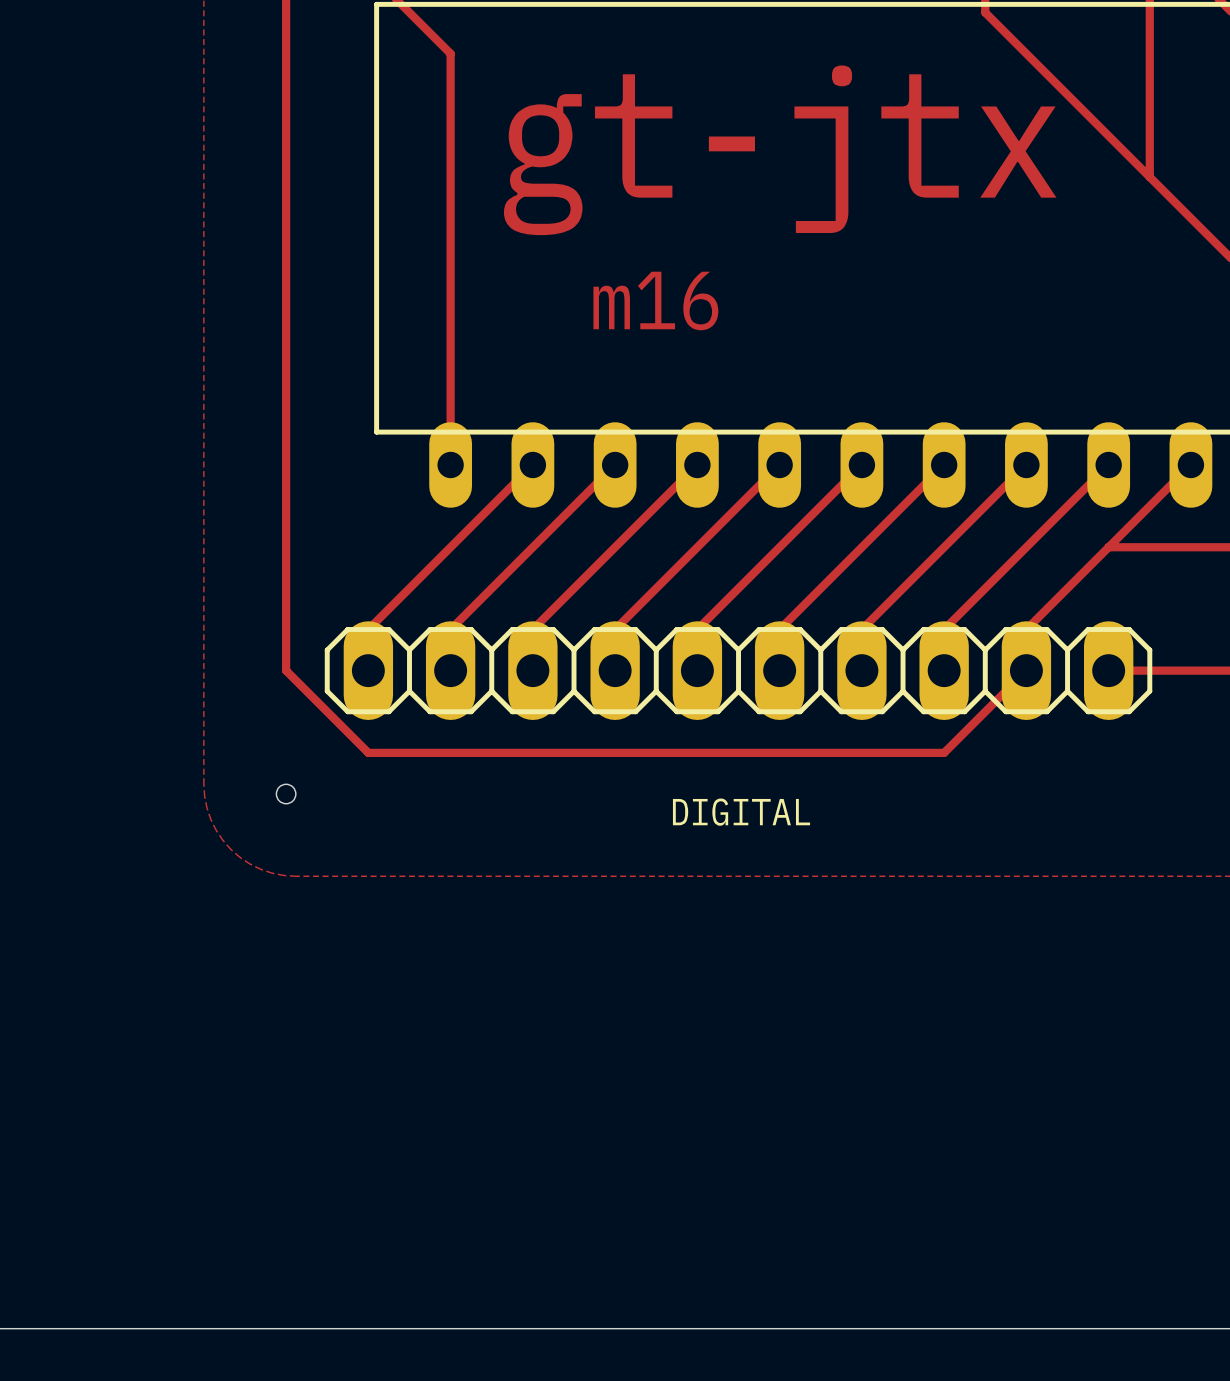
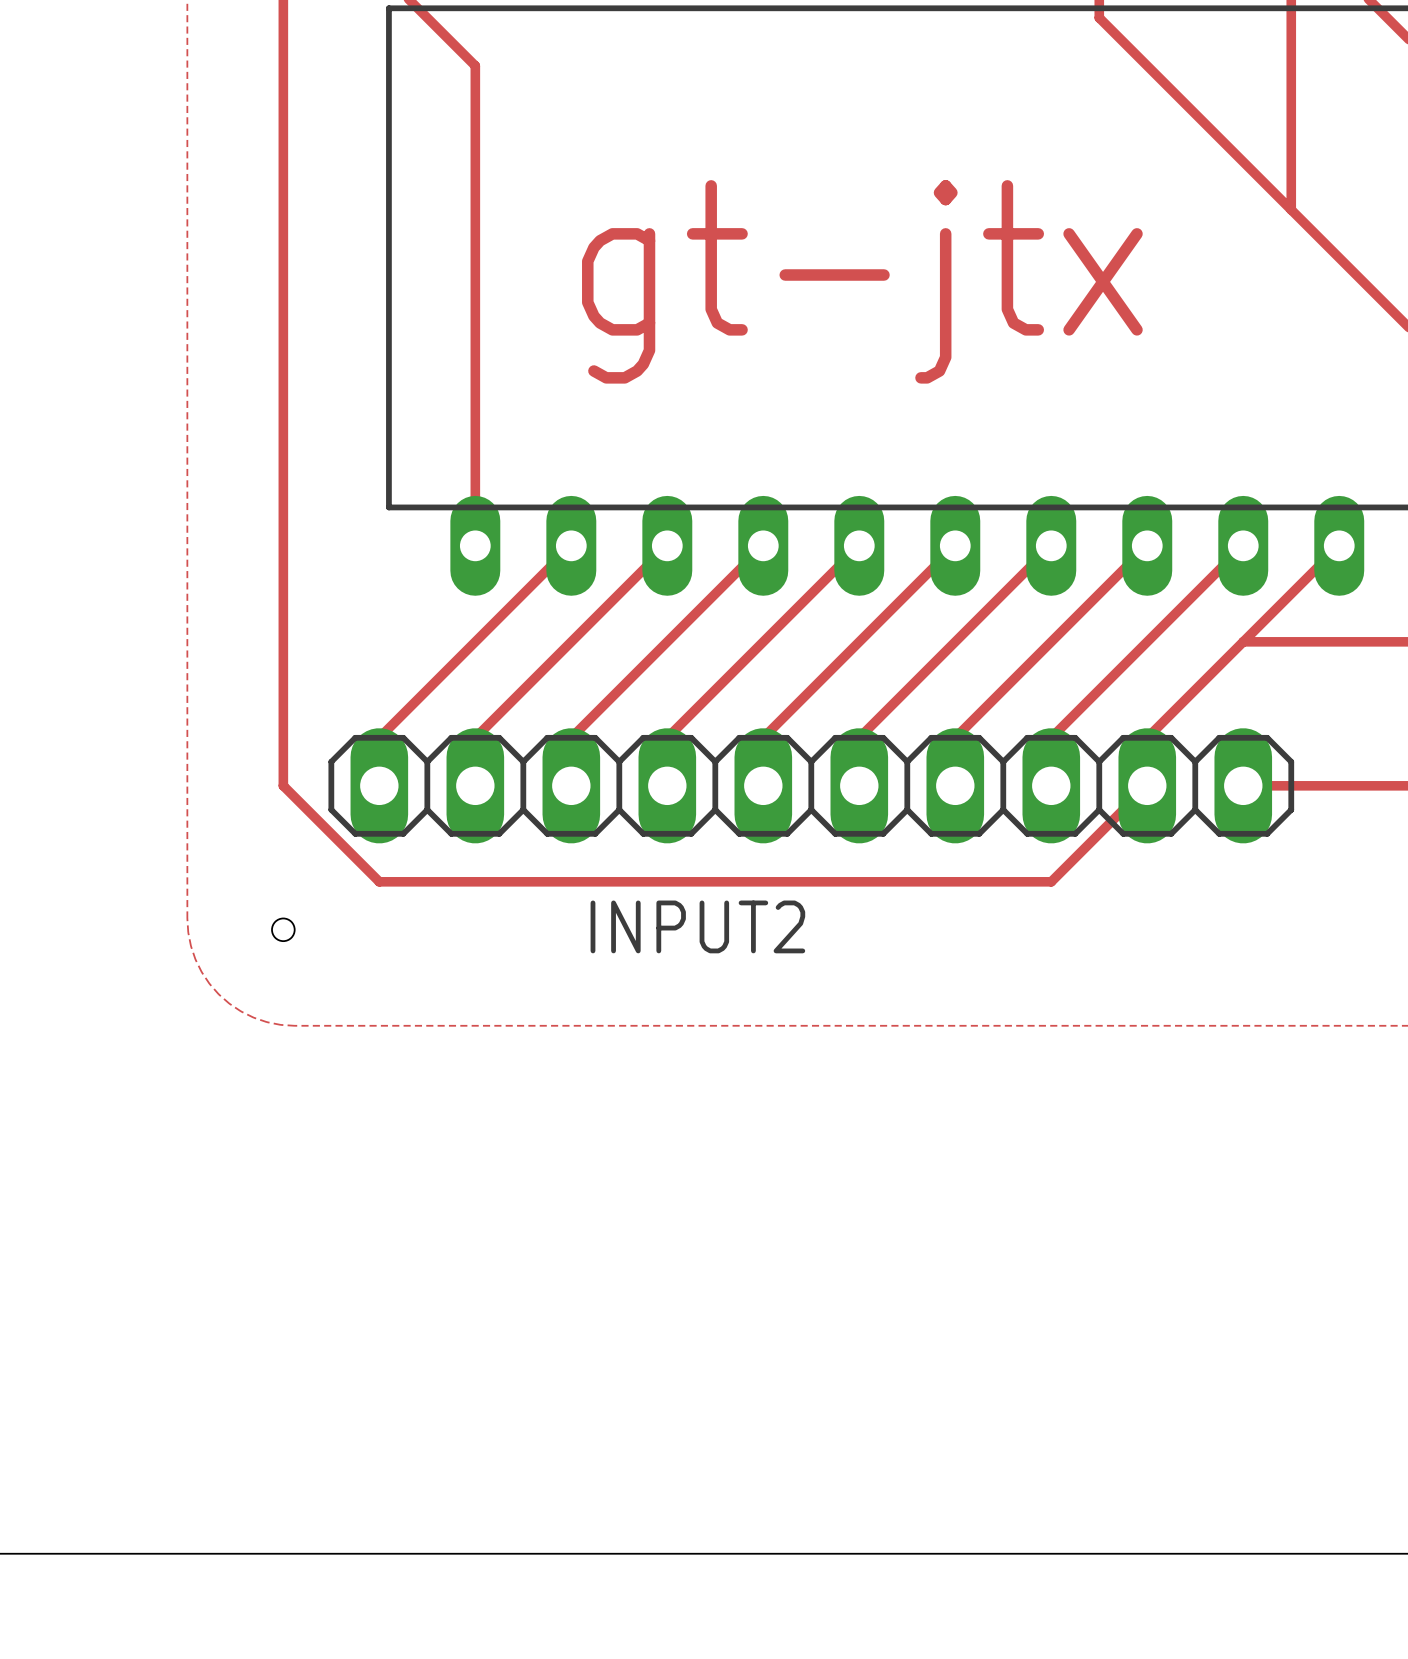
text position: gt-jtx (780, 150) -> gt-jtx (862, 281)
text: m16 (655, 300) -> none
DIGITAL name: DIGITAL (741, 812) -> INPUT2 (697, 926)

